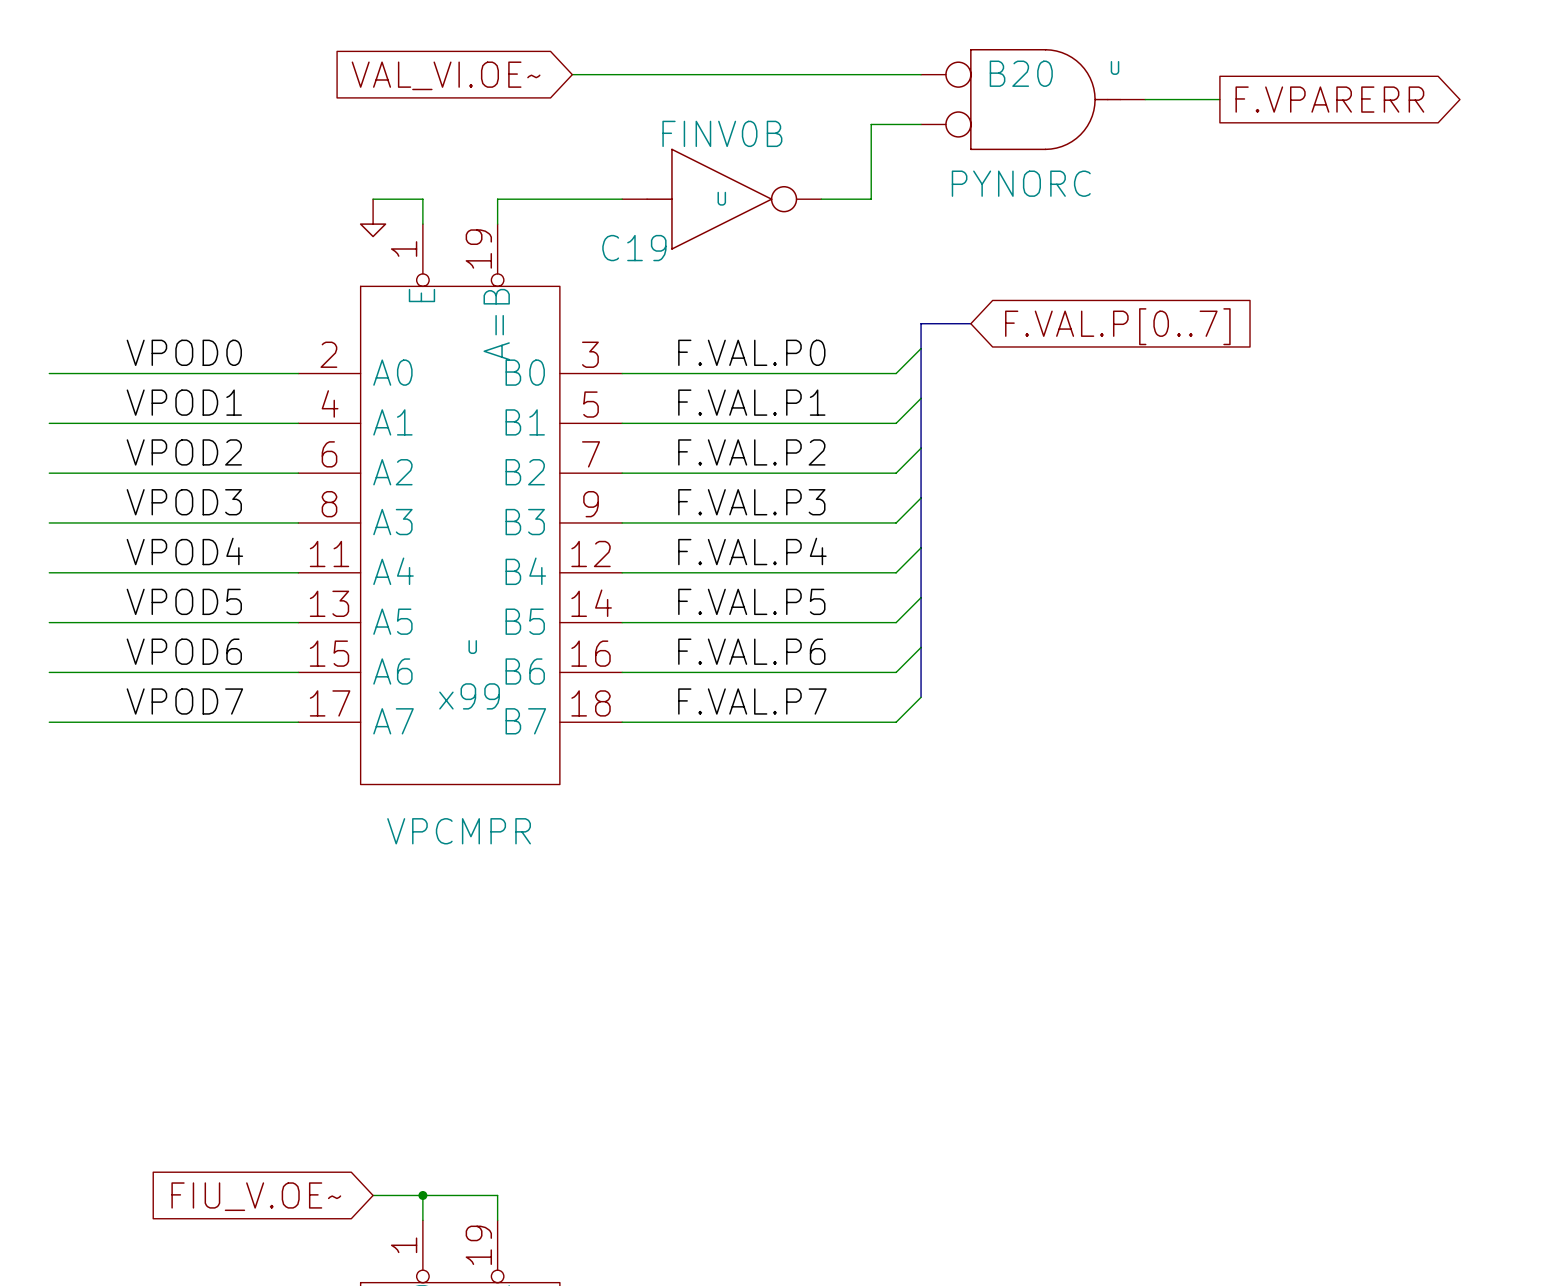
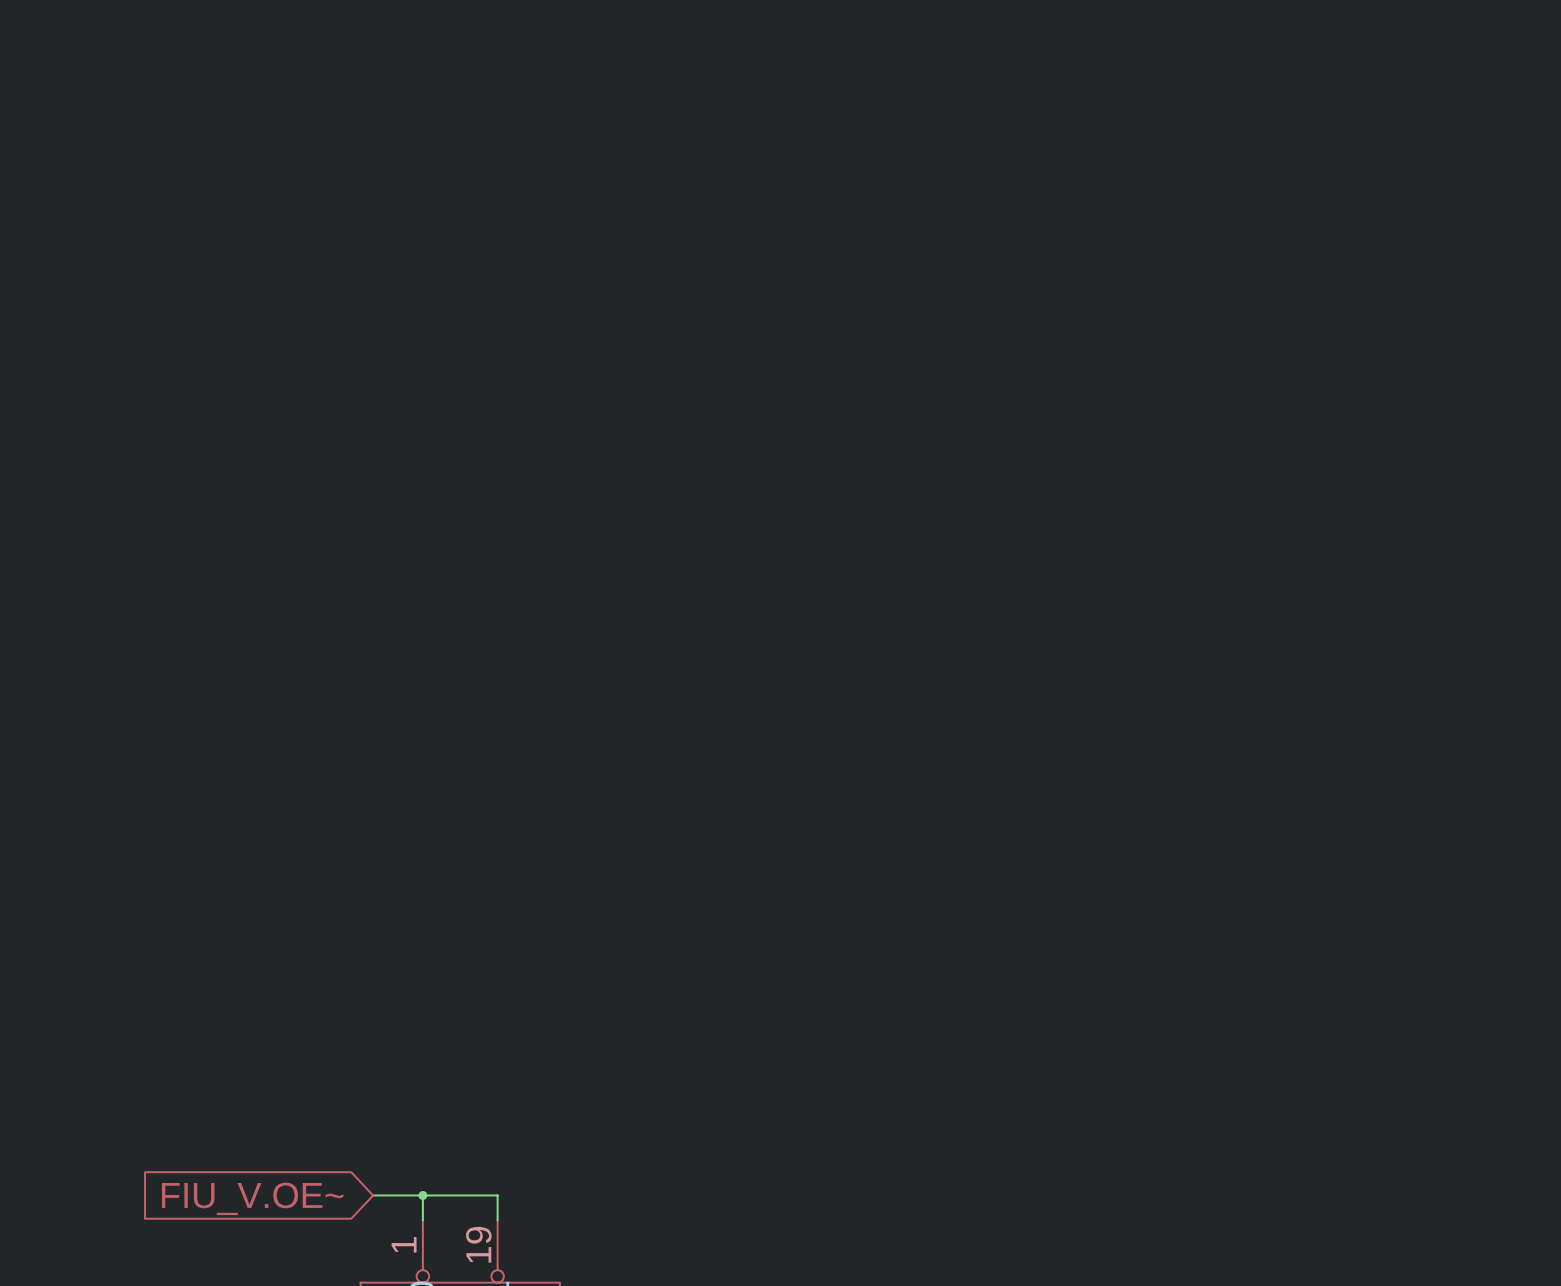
wire: (572, 74) (921, 74) -> none
global label: VAL_VI.OE~ (446, 75) -> none
U: (1033, 99) -> none
wire: (1145, 99) (1219, 99) -> none
global label: F.VPARERR (1329, 99) -> none
wire: (921, 124) (871, 124) (871, 199) (821, 199) -> none
wire: (373, 199) (422, 199) (422, 224) -> none
wire: (622, 199) (497, 199) (497, 224) -> none
U: (721, 199) -> none
power symbol: (373, 218) -> none
bus: (970, 323) (921, 323) (921, 697) -> none
global label: F.VAL.P[0..7] (1117, 326) -> none
wire: (921, 348) (896, 373) (622, 373) -> none
label: VPOD0 (184, 352) -> none
label: F.VAL.P0 (751, 352) -> none
wire: (49, 373) (298, 373) -> none
wire: (921, 398) (896, 423) (622, 423) -> none
label: VPOD1 (184, 402) -> none
label: F.VAL.P1 (751, 402) -> none
wire: (49, 423) (298, 423) -> none
wire: (921, 448) (896, 473) (622, 473) -> none
label: VPOD2 (184, 452) -> none
label: F.VAL.P2 (751, 452) -> none
wire: (49, 473) (298, 473) -> none
wire: (921, 498) (896, 522) (622, 522) -> none
label: VPOD3 (184, 502) -> none
label: F.VAL.P3 (751, 502) -> none
U: (460, 504) -> none
wire: (49, 522) (298, 522) -> none
wire: (921, 547) (896, 572) (622, 572) -> none
label: VPOD4 (184, 551) -> none
label: F.VAL.P4 (752, 551) -> none
wire: (49, 572) (298, 572) -> none
wire: (921, 597) (896, 622) (622, 622) -> none
label: VPOD5 (184, 601) -> none
label: F.VAL.P5 (751, 601) -> none
wire: (49, 622) (298, 622) -> none
wire: (921, 647) (896, 672) (622, 672) -> none
label: VPOD6 (184, 651) -> none
label: F.VAL.P6 (751, 651) -> none
wire: (49, 672) (298, 672) -> none
wire: (921, 697) (896, 722) (622, 722) -> none
label: VPOD7 (184, 701) -> none
label: F.VAL.P7 (752, 701) -> none
wire: (49, 722) (298, 722) -> none

